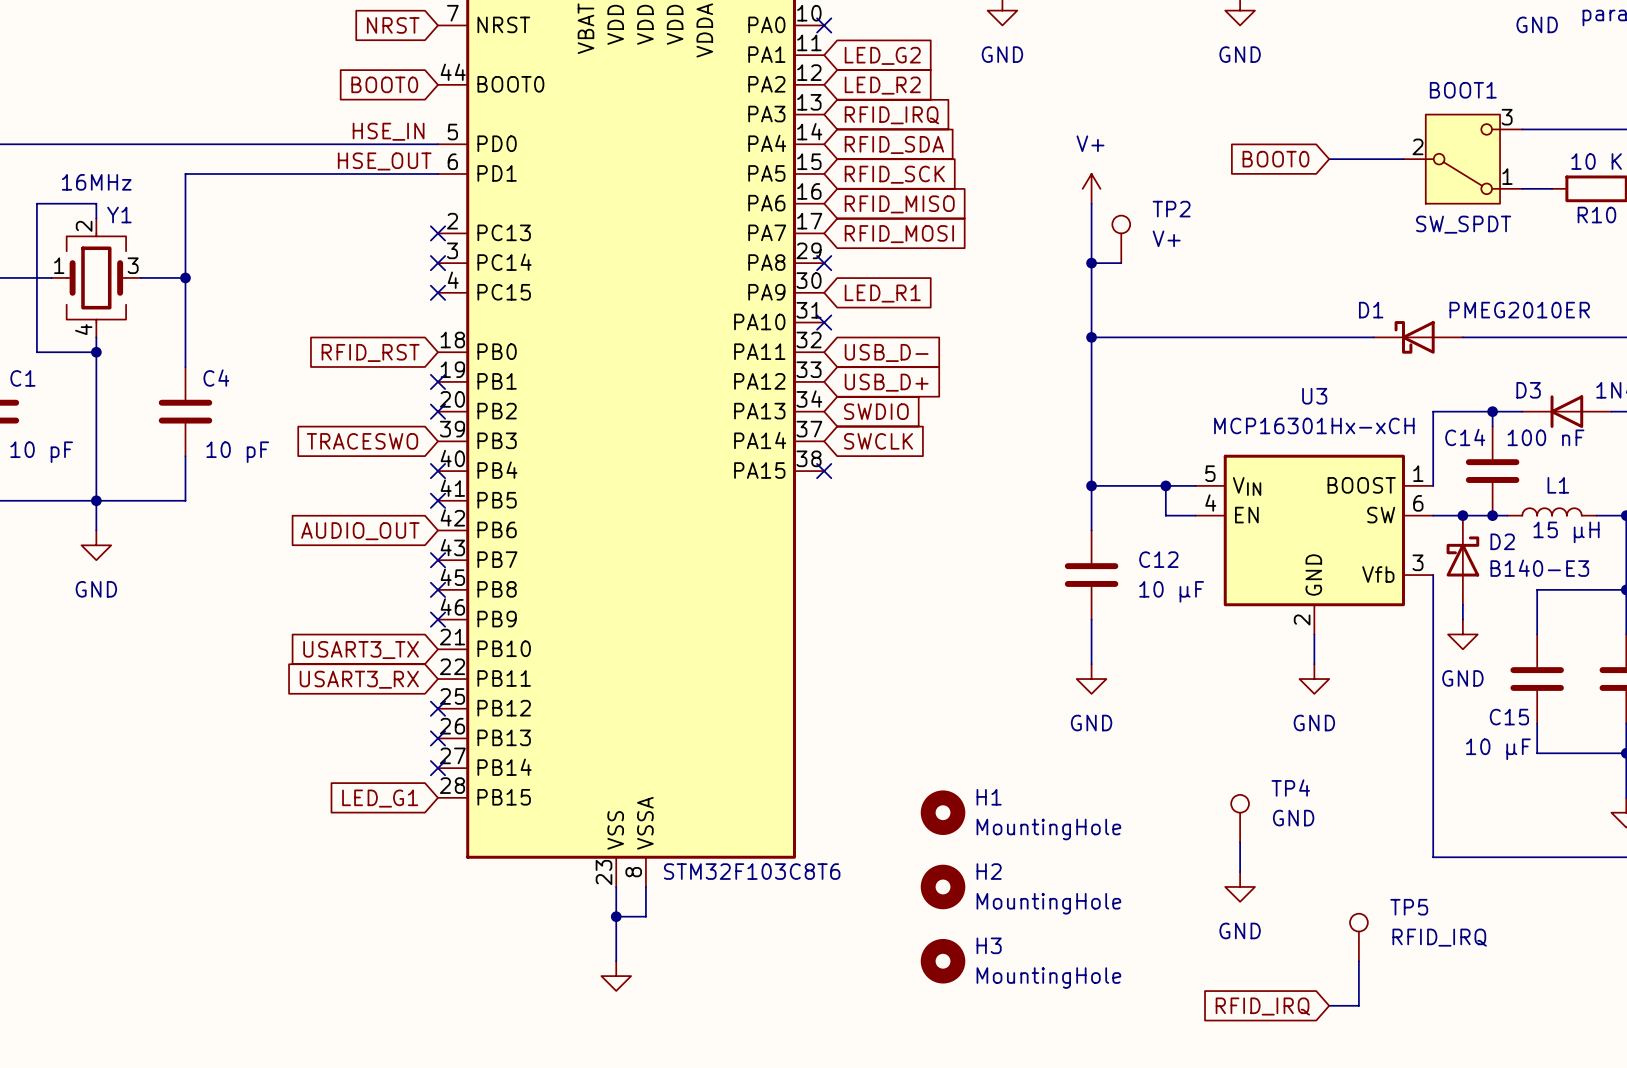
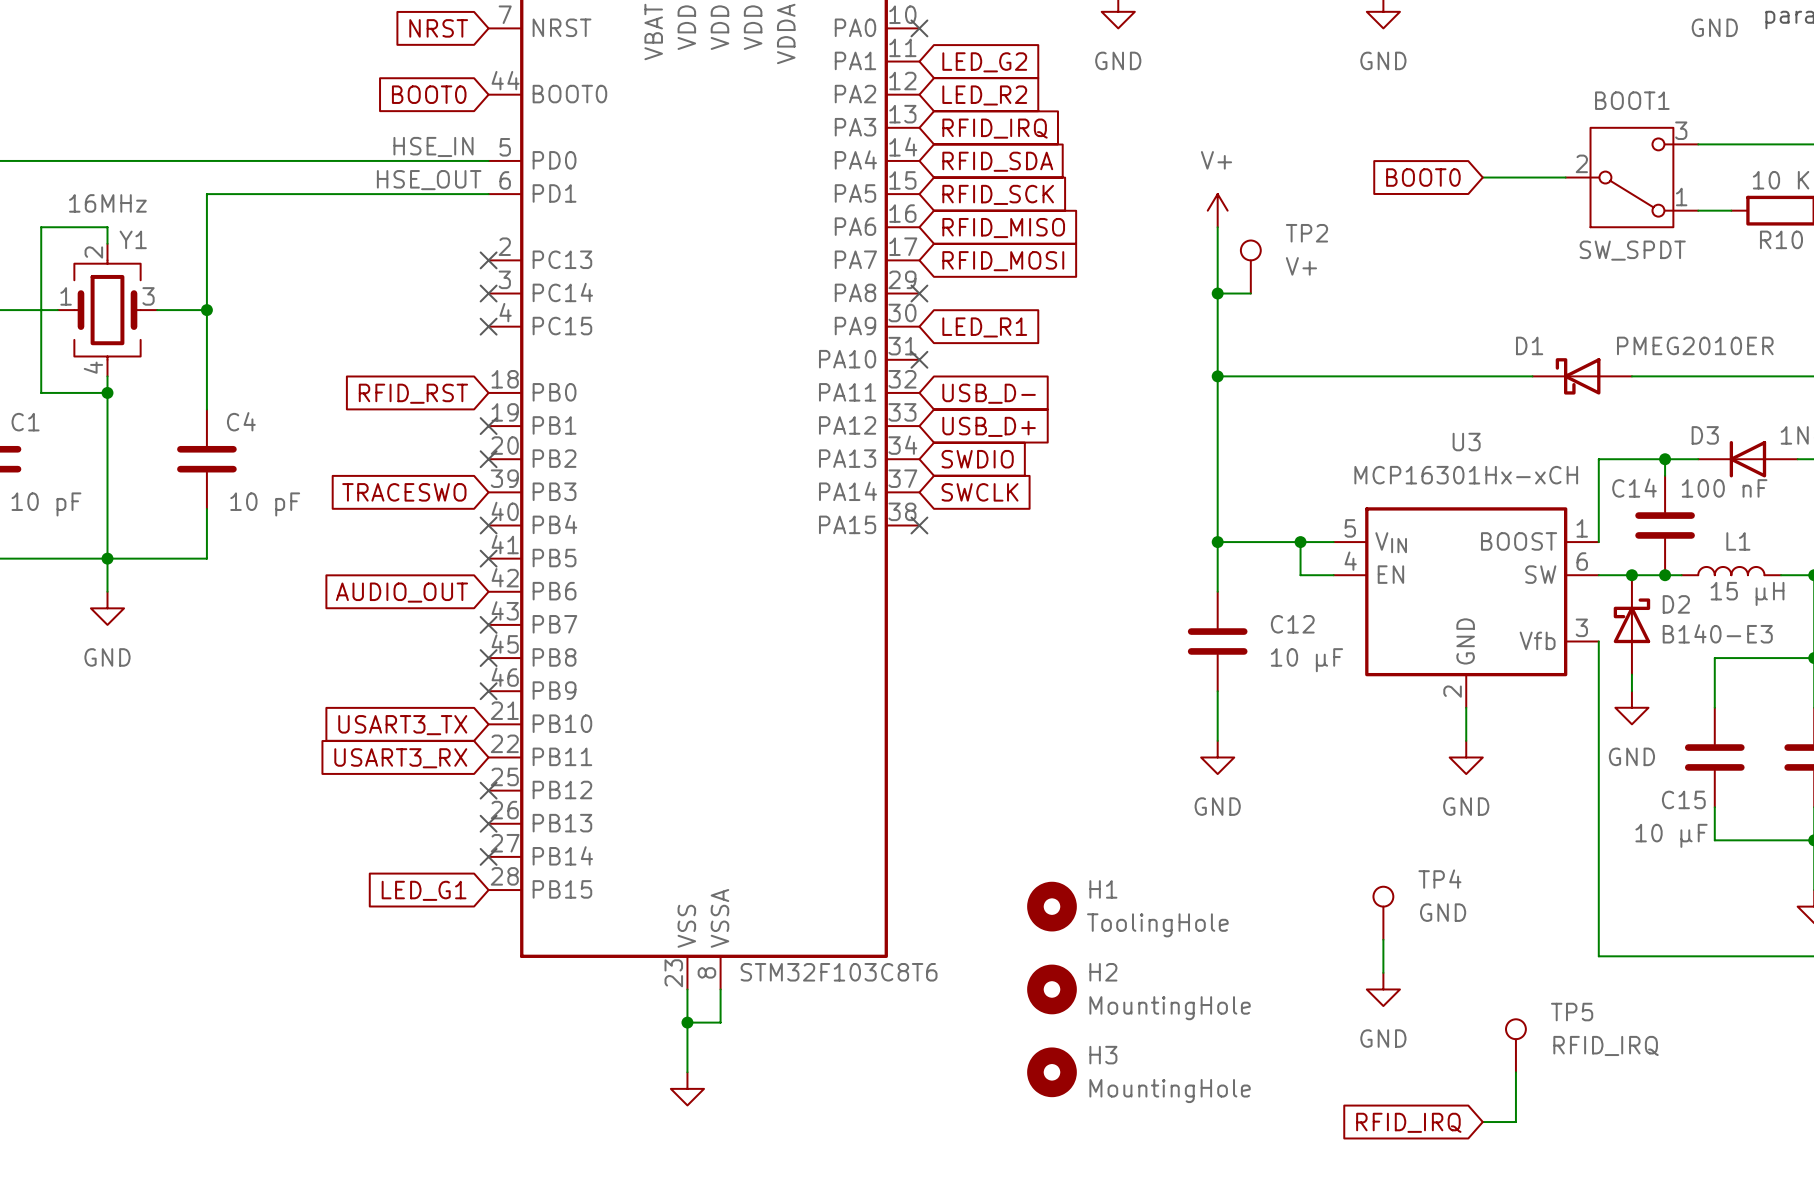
H1 value: MountingHole (1048, 829) -> ToolingHole (1157, 925)

